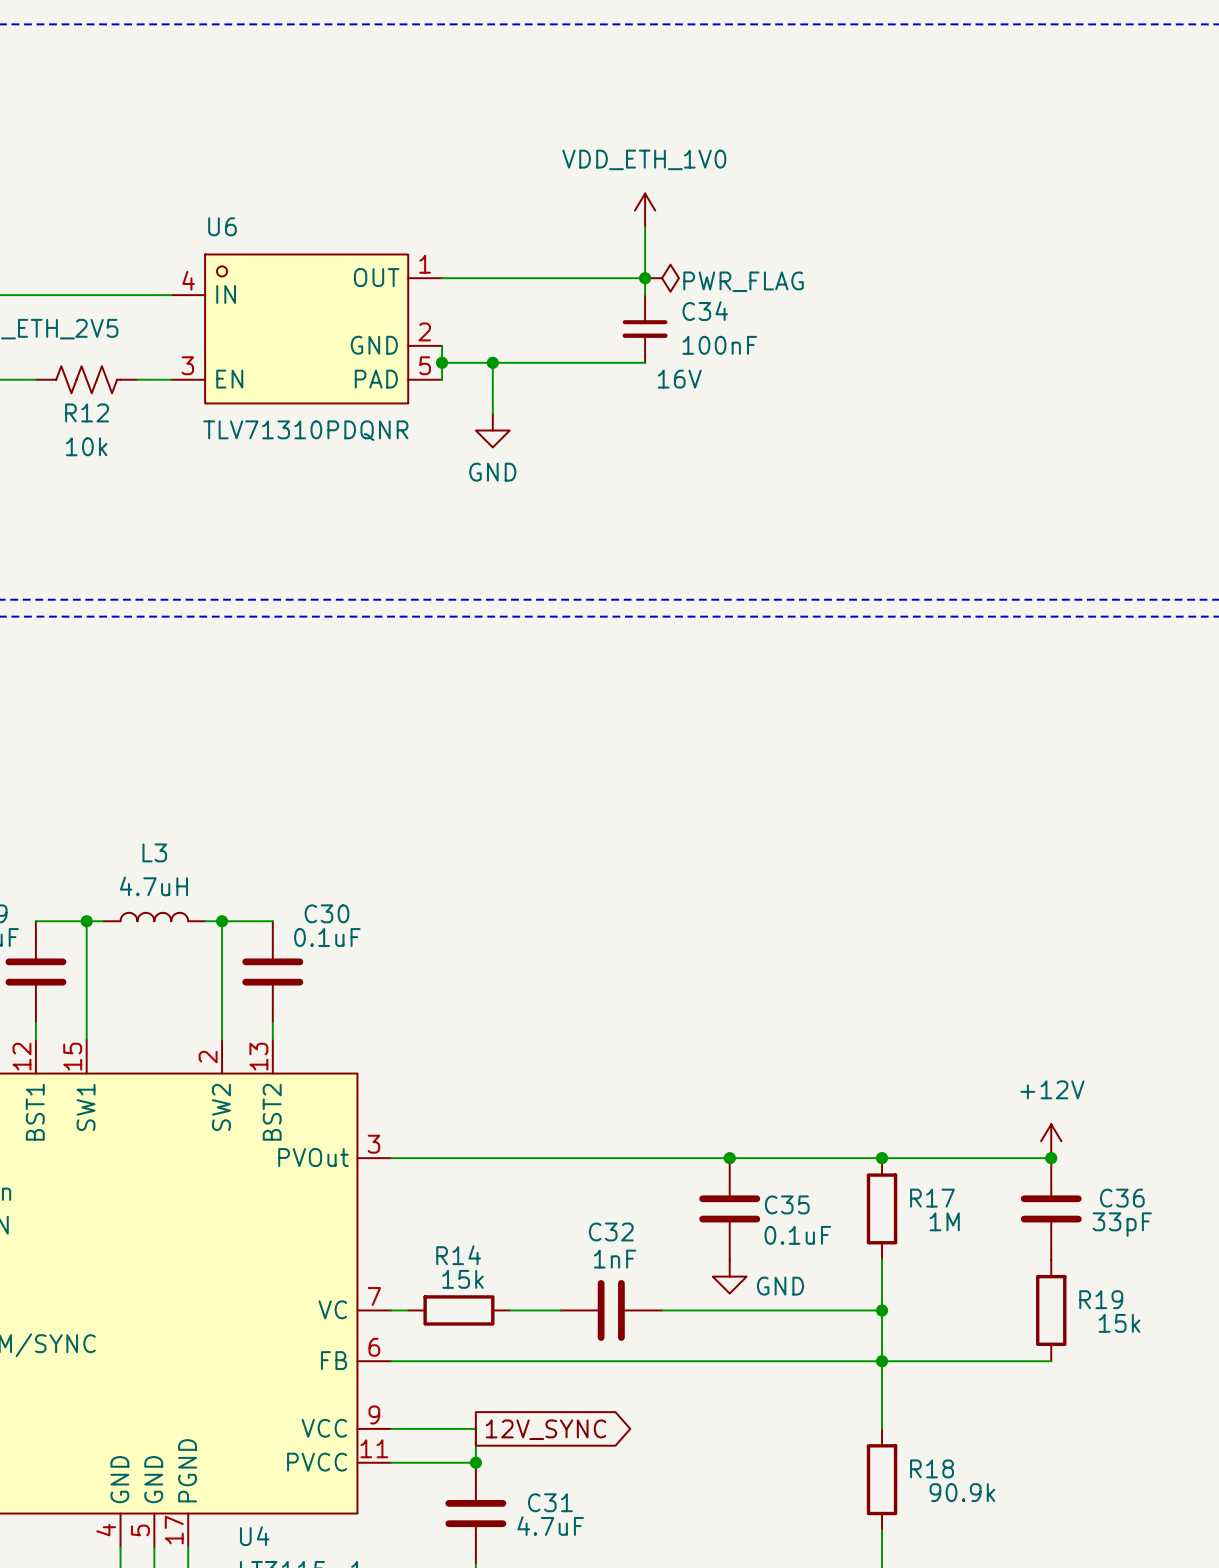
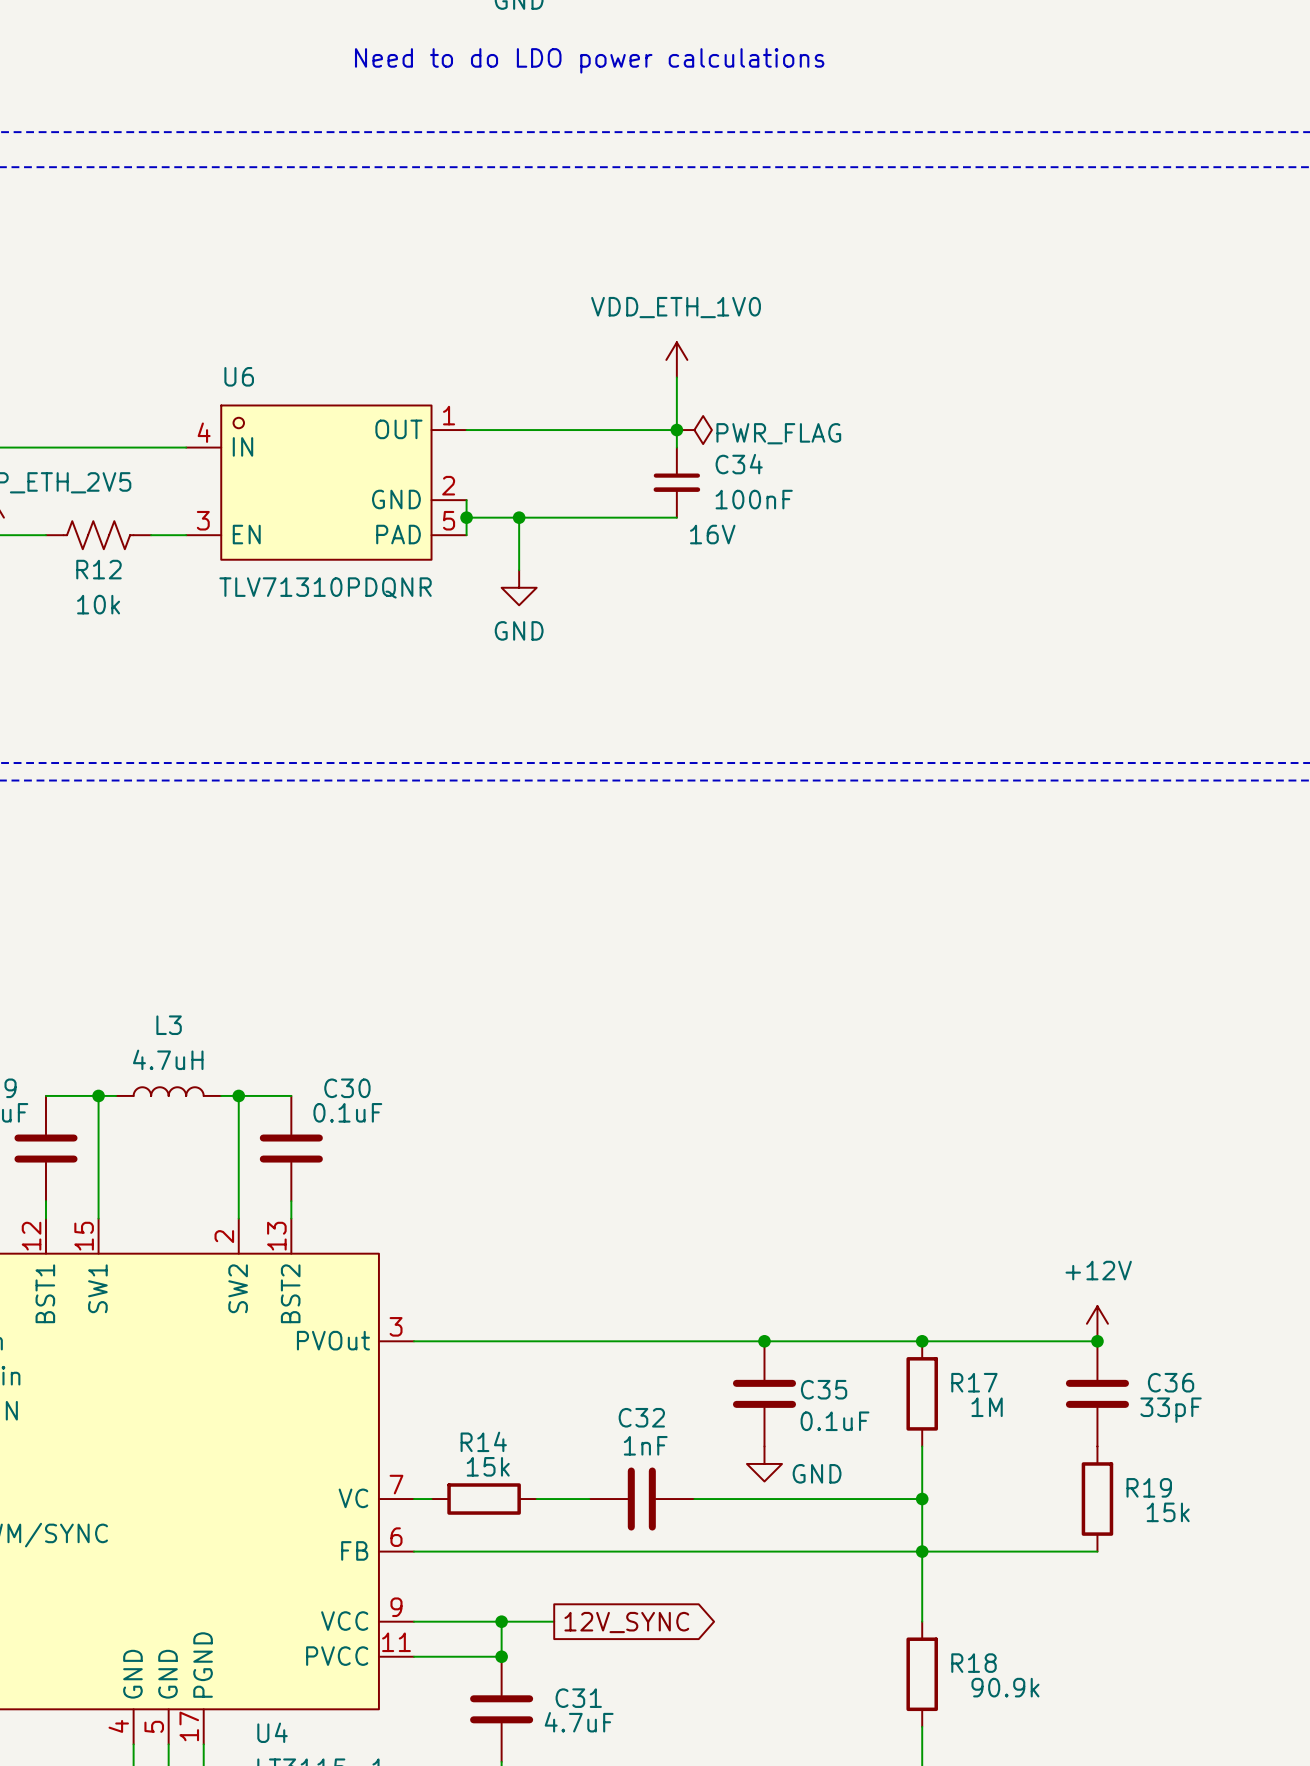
wire: none -> (501, 1621) (554, 1621)
junction: none -> (501, 1621)
global label position: 12V_SYNC (546, 1429) -> 12V_SYNC (626, 1622)

